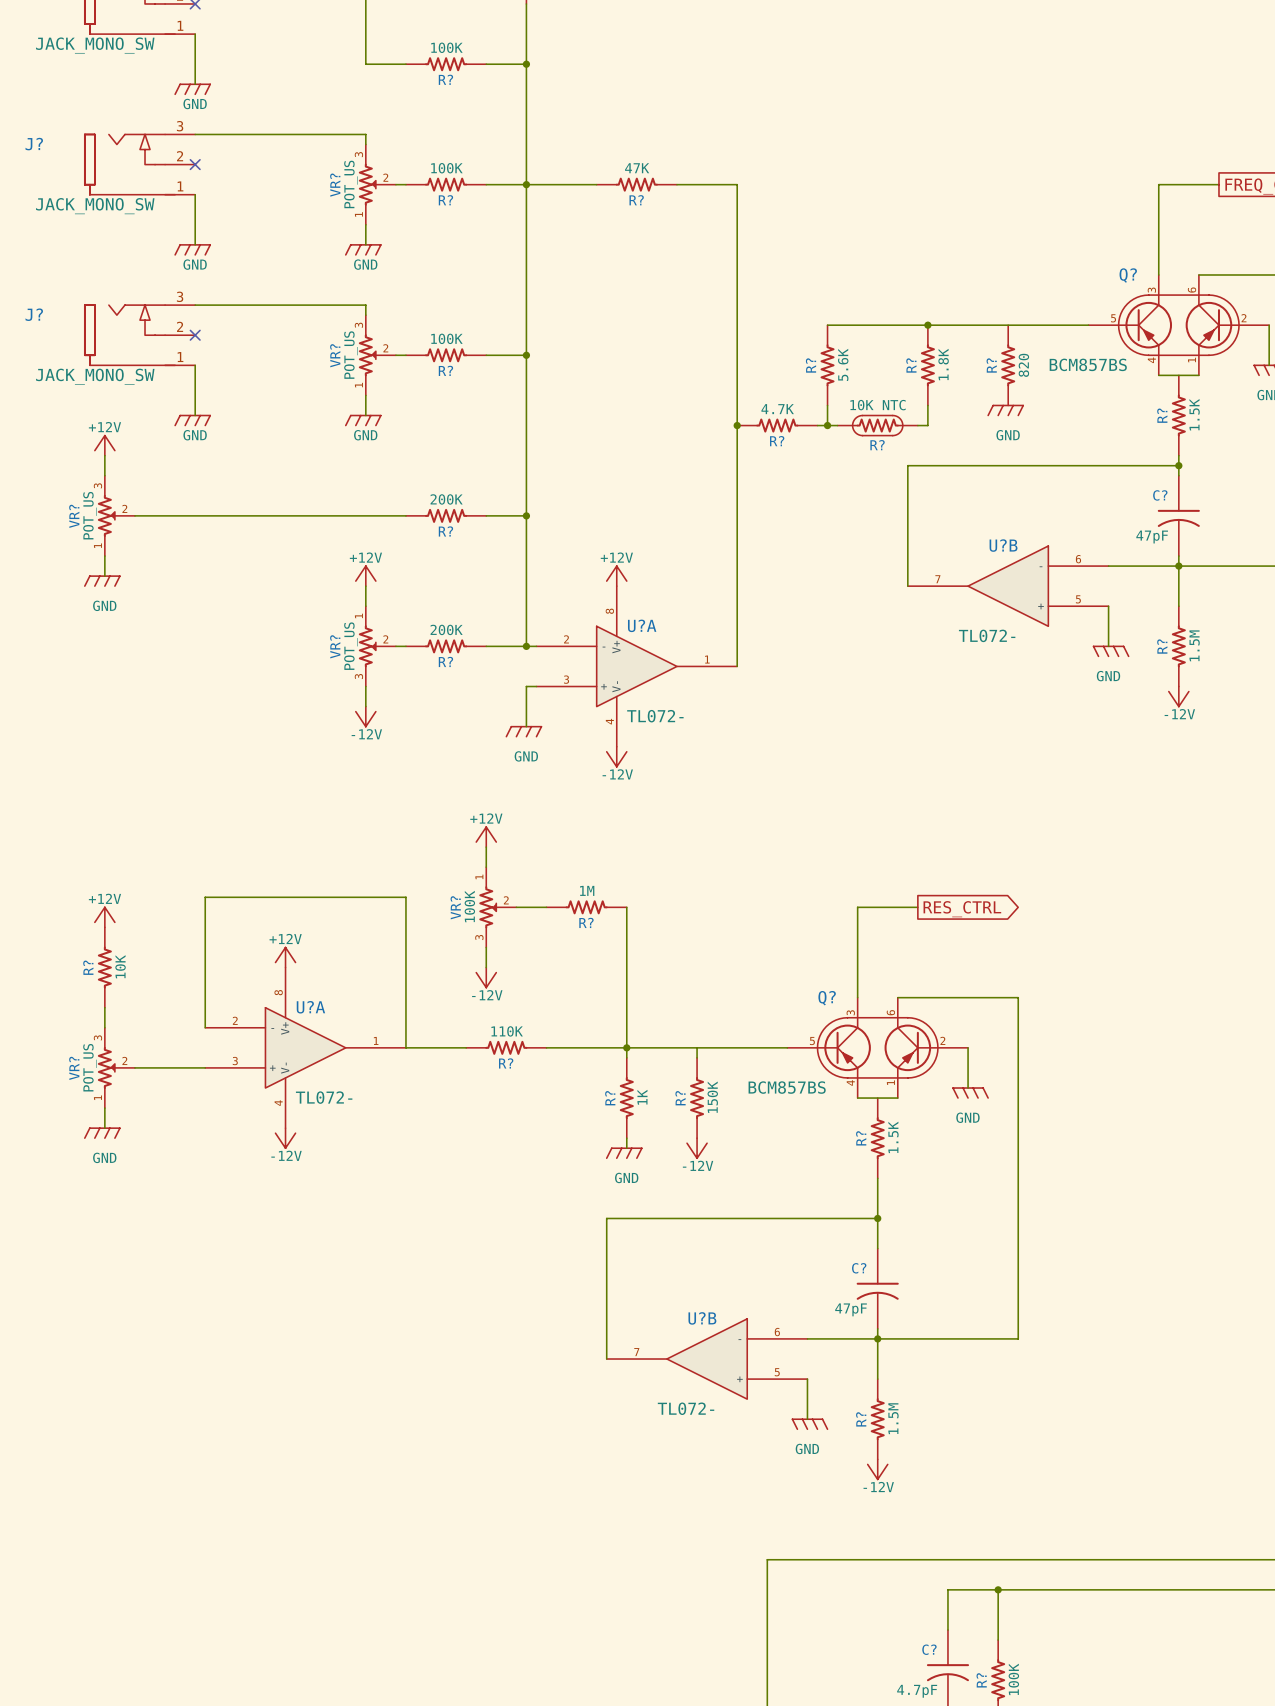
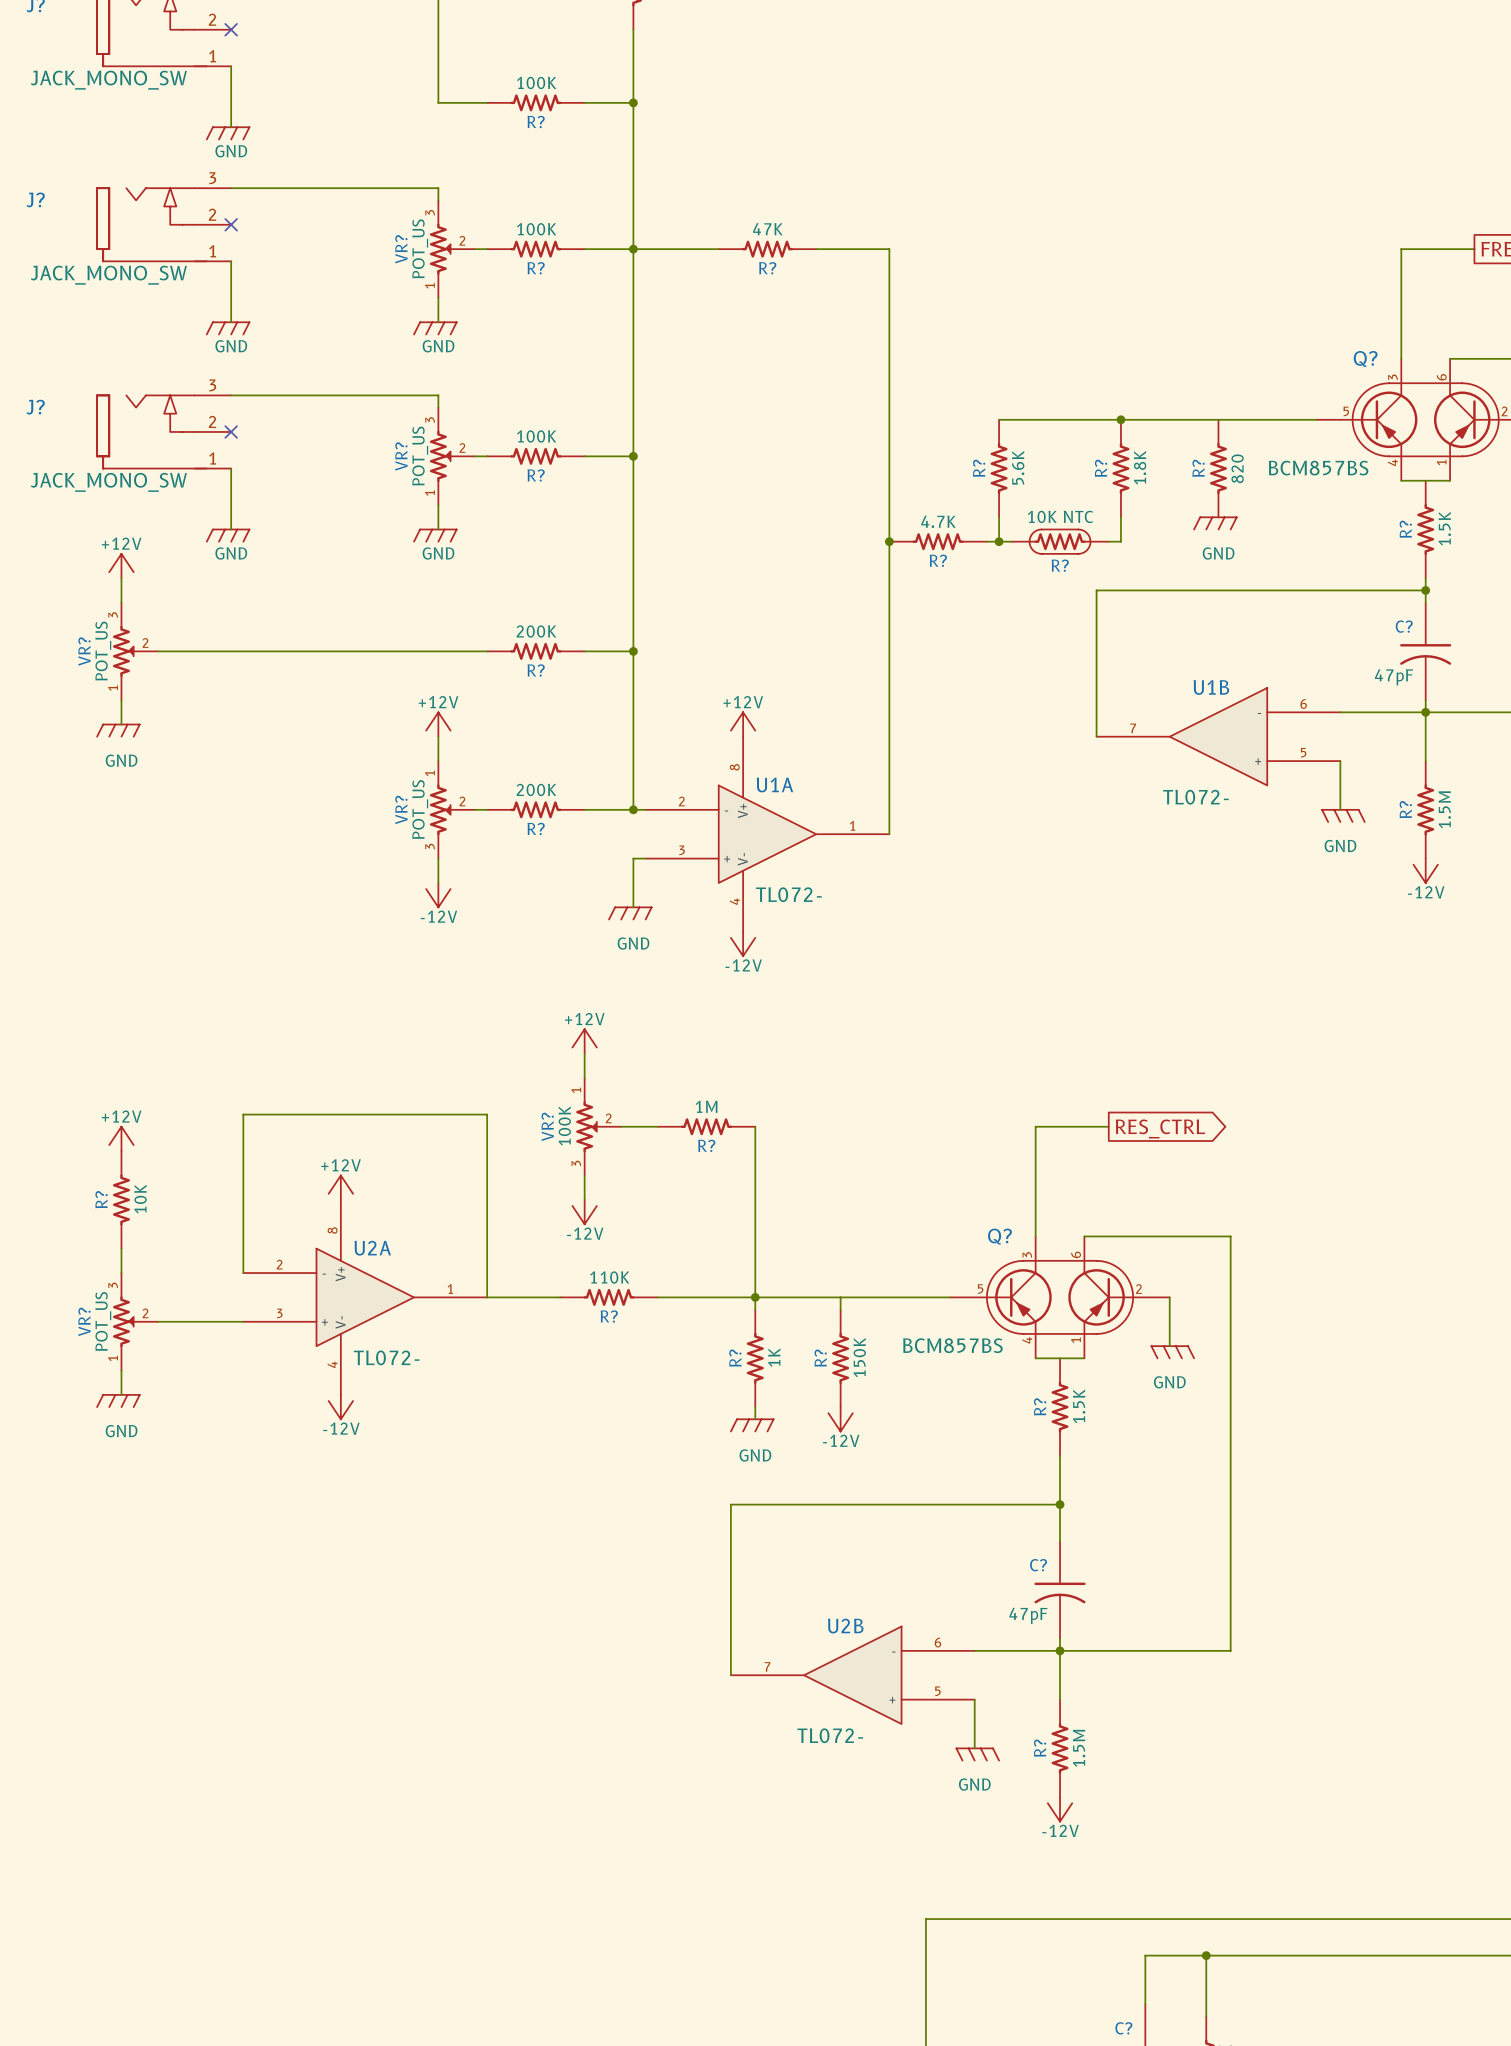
U?B name: U?B (1003, 545) -> U1B (1211, 687)
U?A name: U?A (642, 625) -> U1A (774, 784)
U?A name: U?A (310, 1007) -> U2A (372, 1248)
U?B name: U?B (702, 1318) -> U2B (845, 1626)

